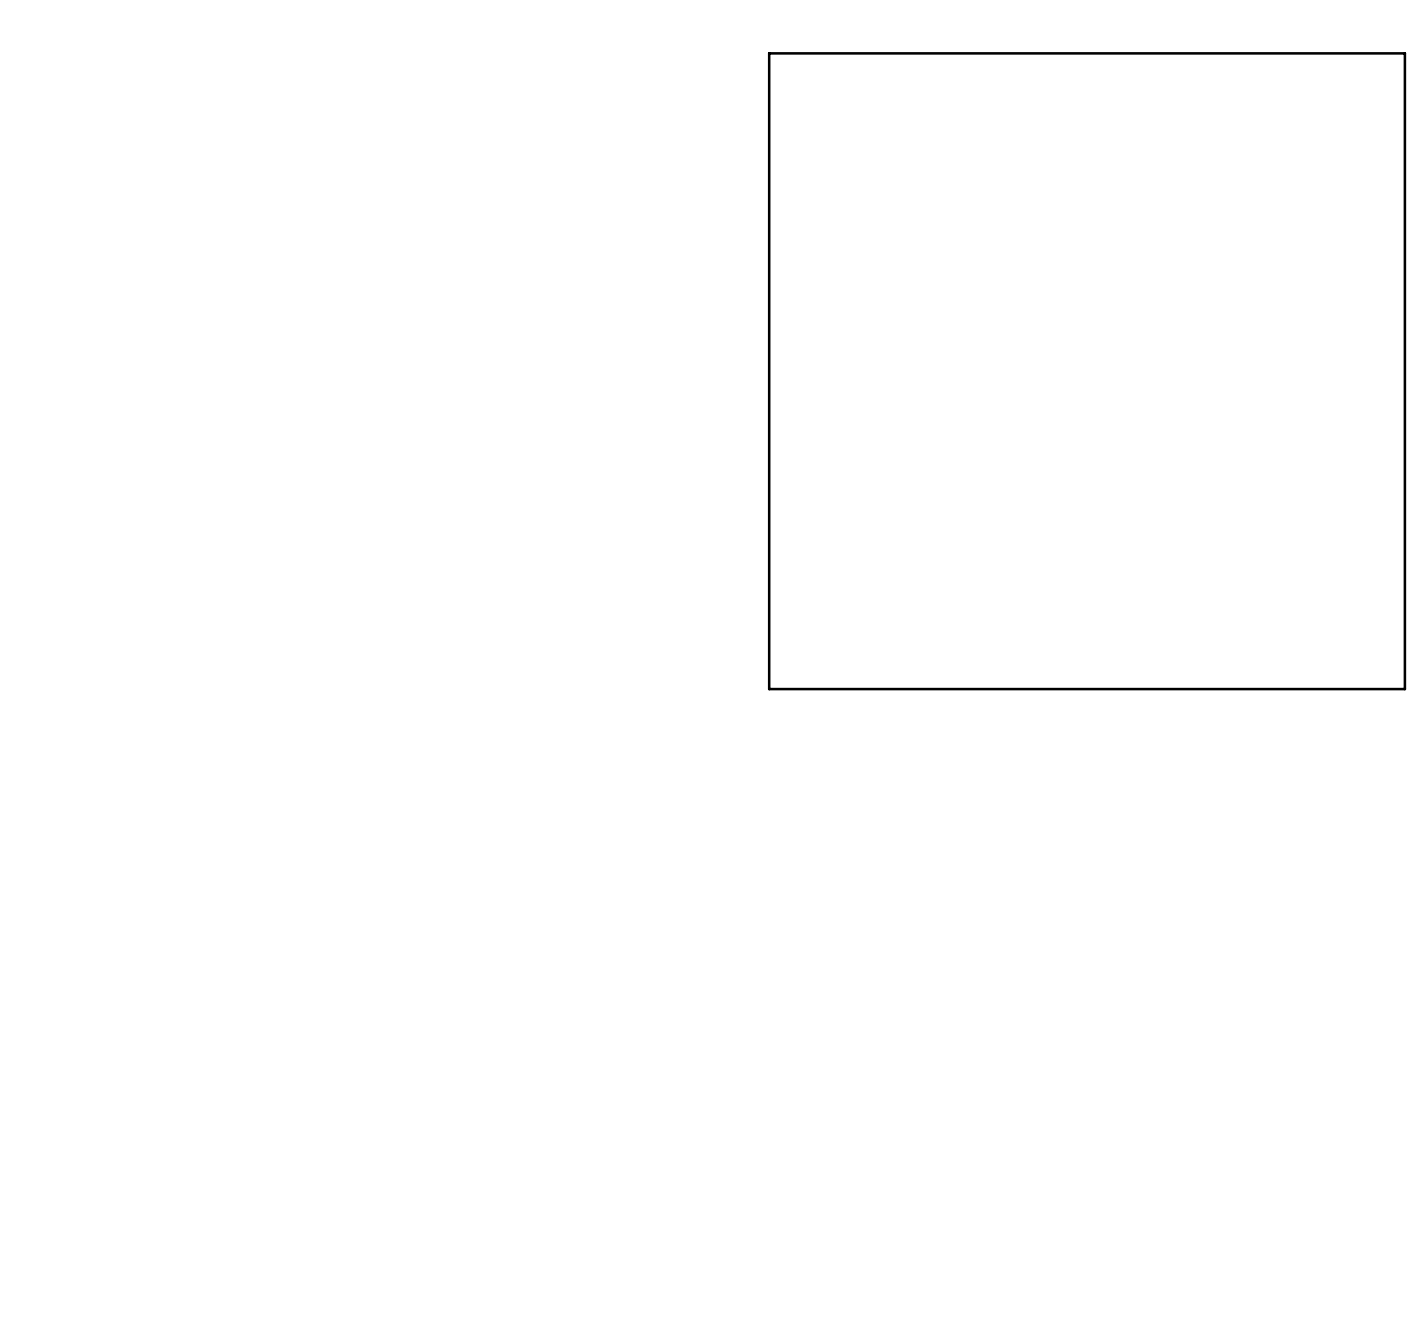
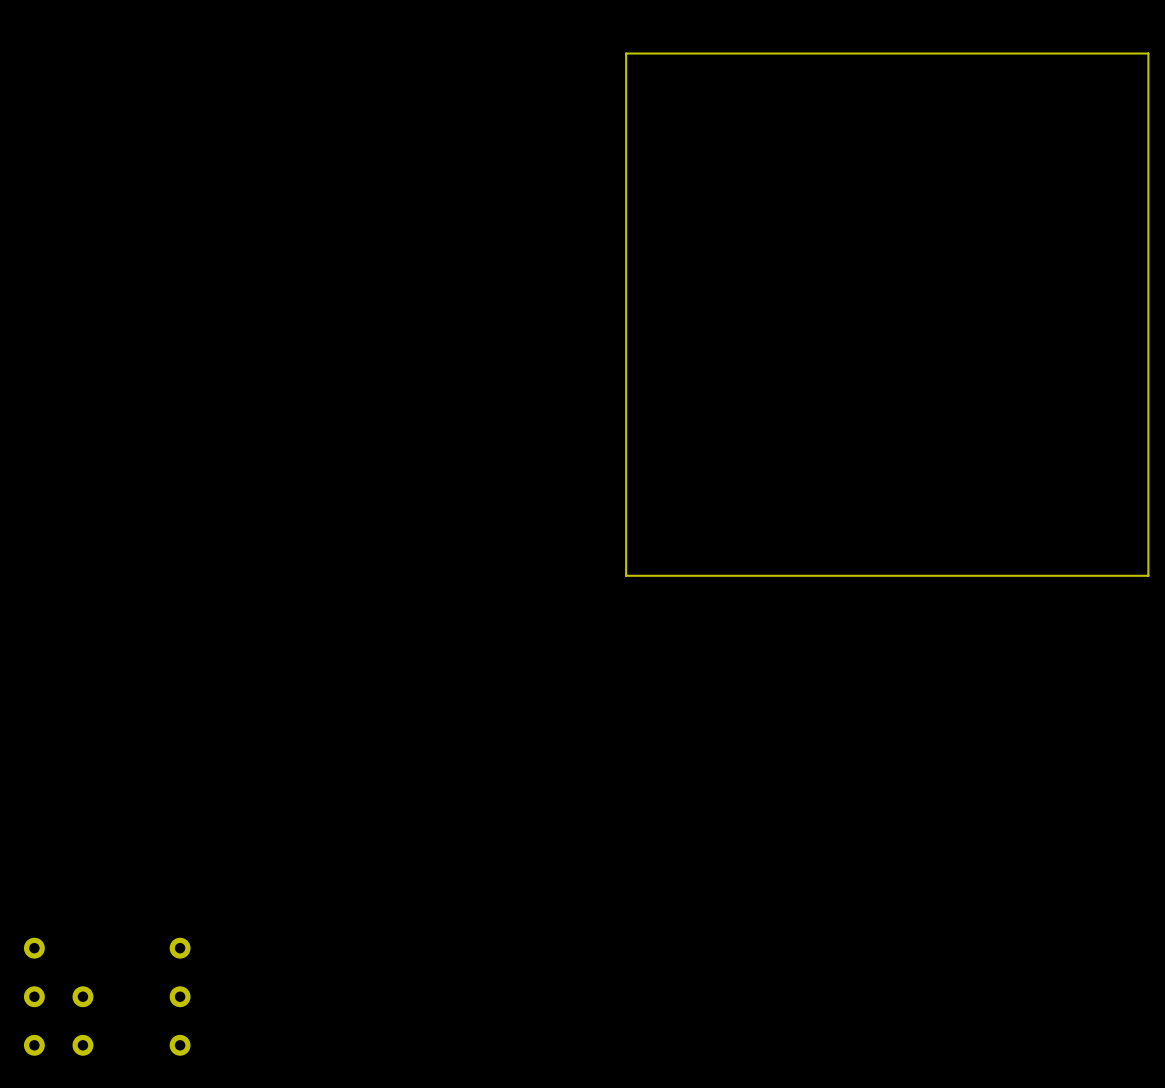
part: none -> (34, 948)
part: none -> (180, 948)
part: none -> (34, 996)
part: none -> (82, 996)
part: none -> (180, 996)
part: none -> (34, 1045)
part: none -> (82, 1045)
part: none -> (180, 1045)

